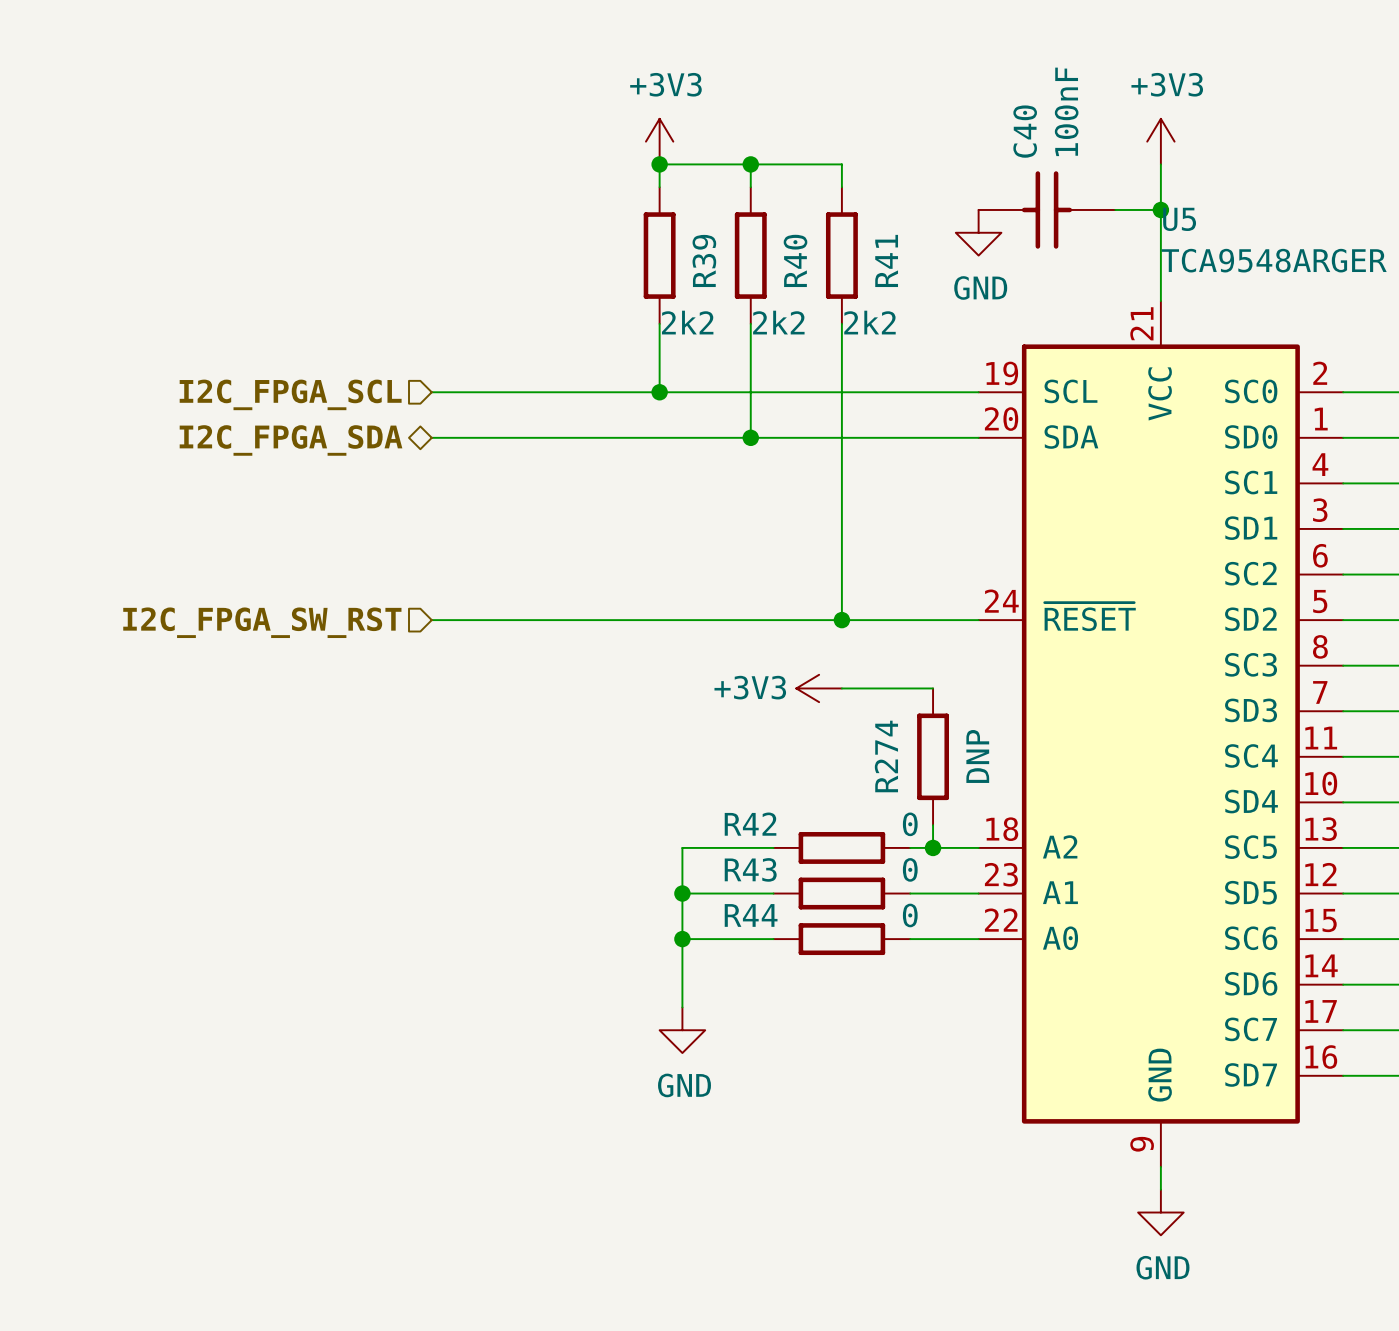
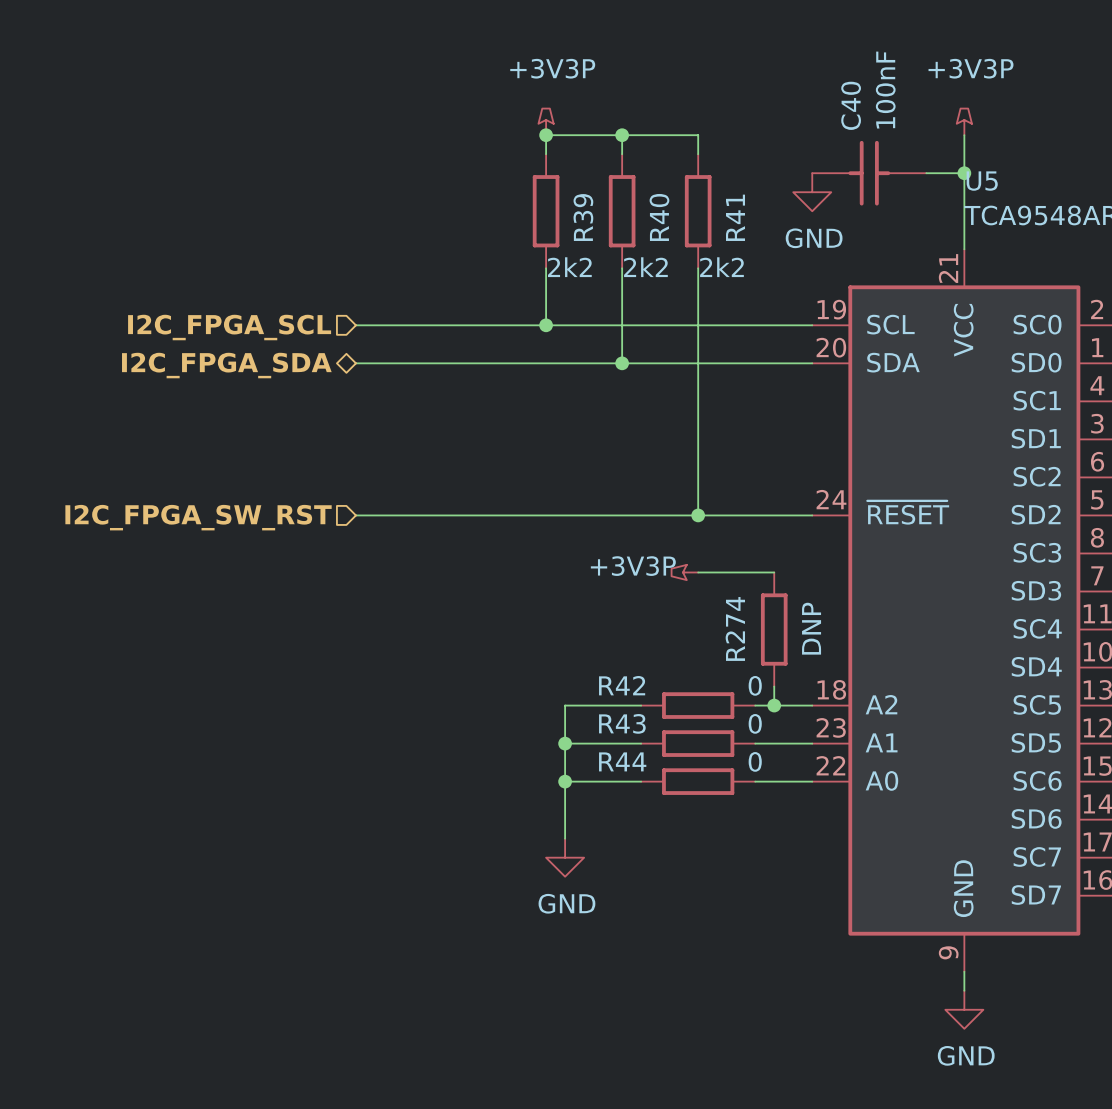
power symbol: +3V3 (659, 141) -> +3V3P (546, 121)
power symbol: +3V3 (1160, 141) -> +3V3P (964, 121)
power symbol: +3V3 (819, 688) -> +3V3P (684, 572)

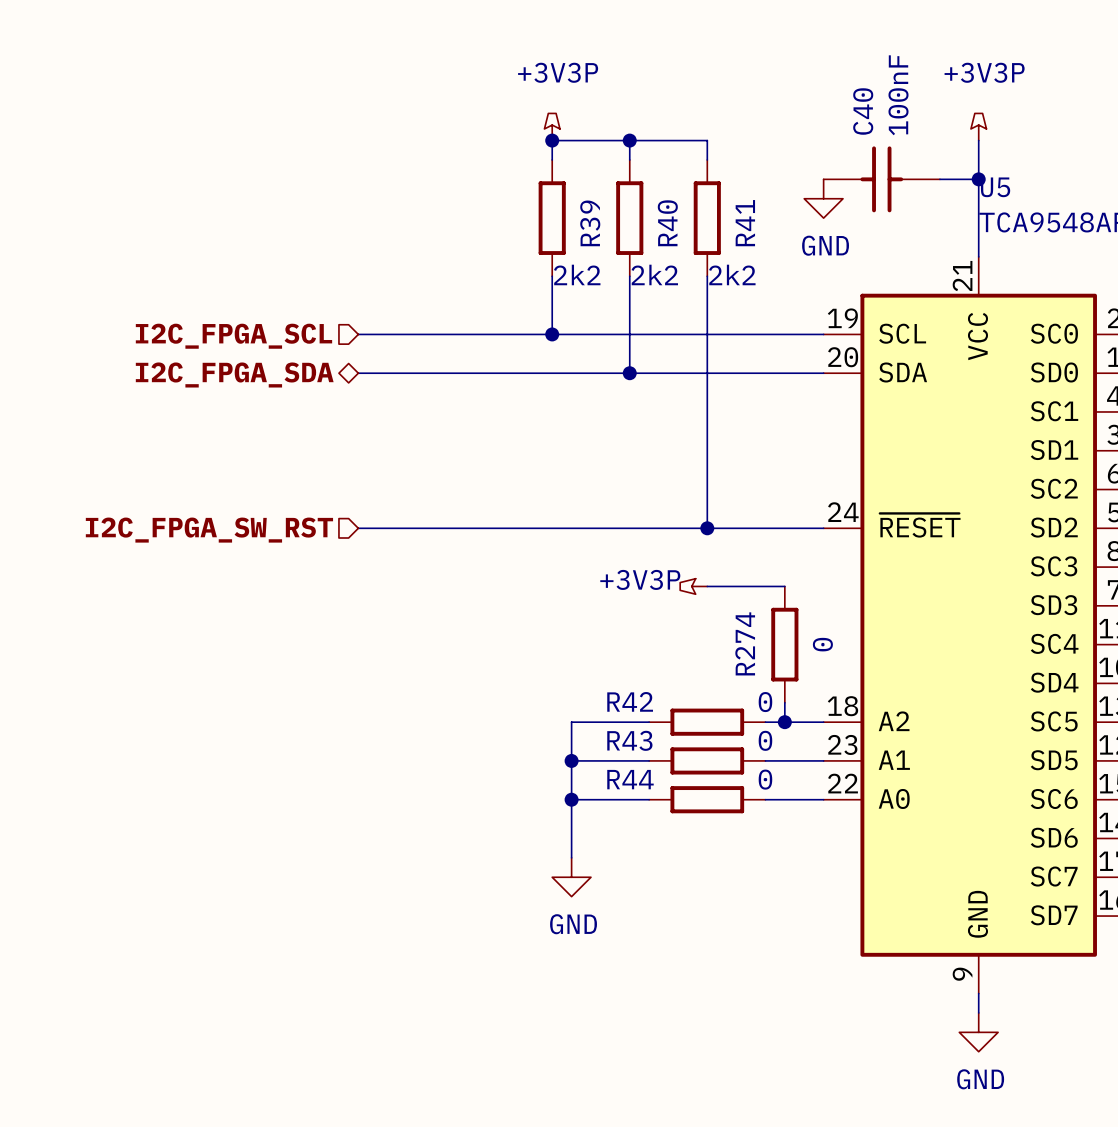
R274 text: DNP (811, 628) -> none
R274 text: none -> 0 (822, 644)

